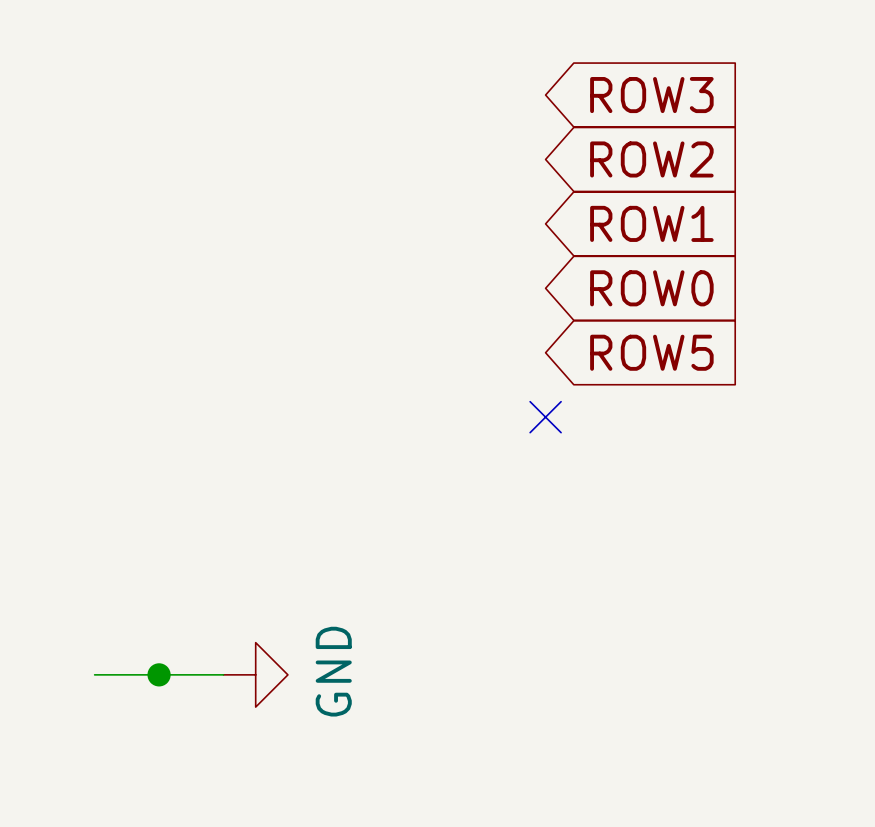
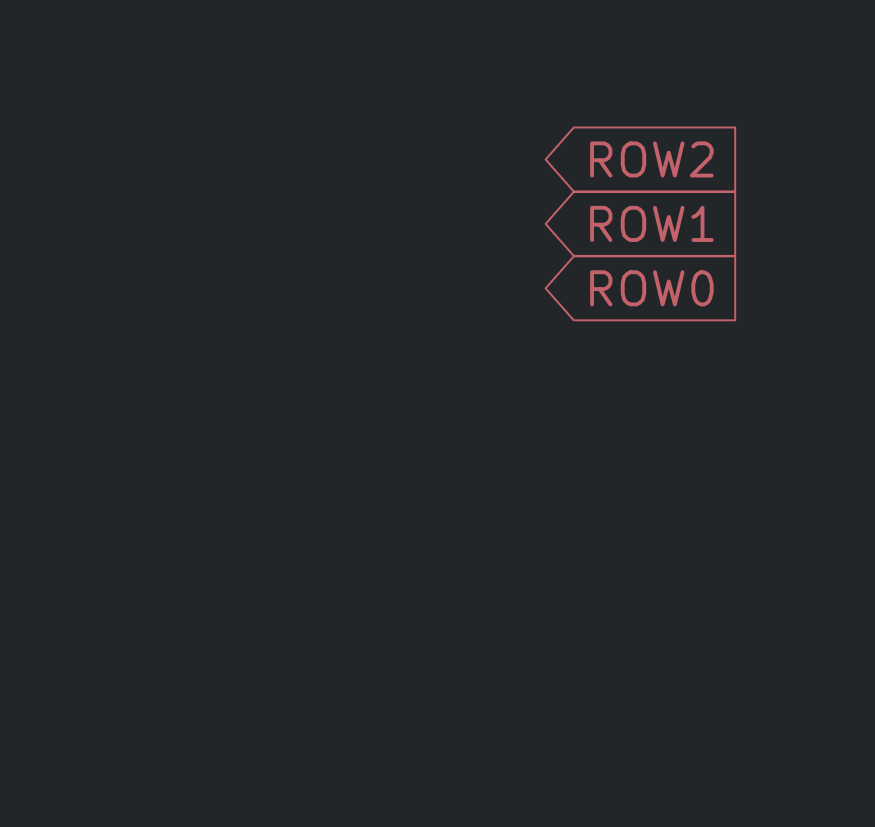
global label: ROW3 (651, 95) -> none
global label: ROW5 (651, 352) -> none
no-connect mark: (545, 417) -> none
wire: (94, 674) (223, 674) -> none
junction: (159, 674) -> none
power symbol: GND (255, 674) -> none

